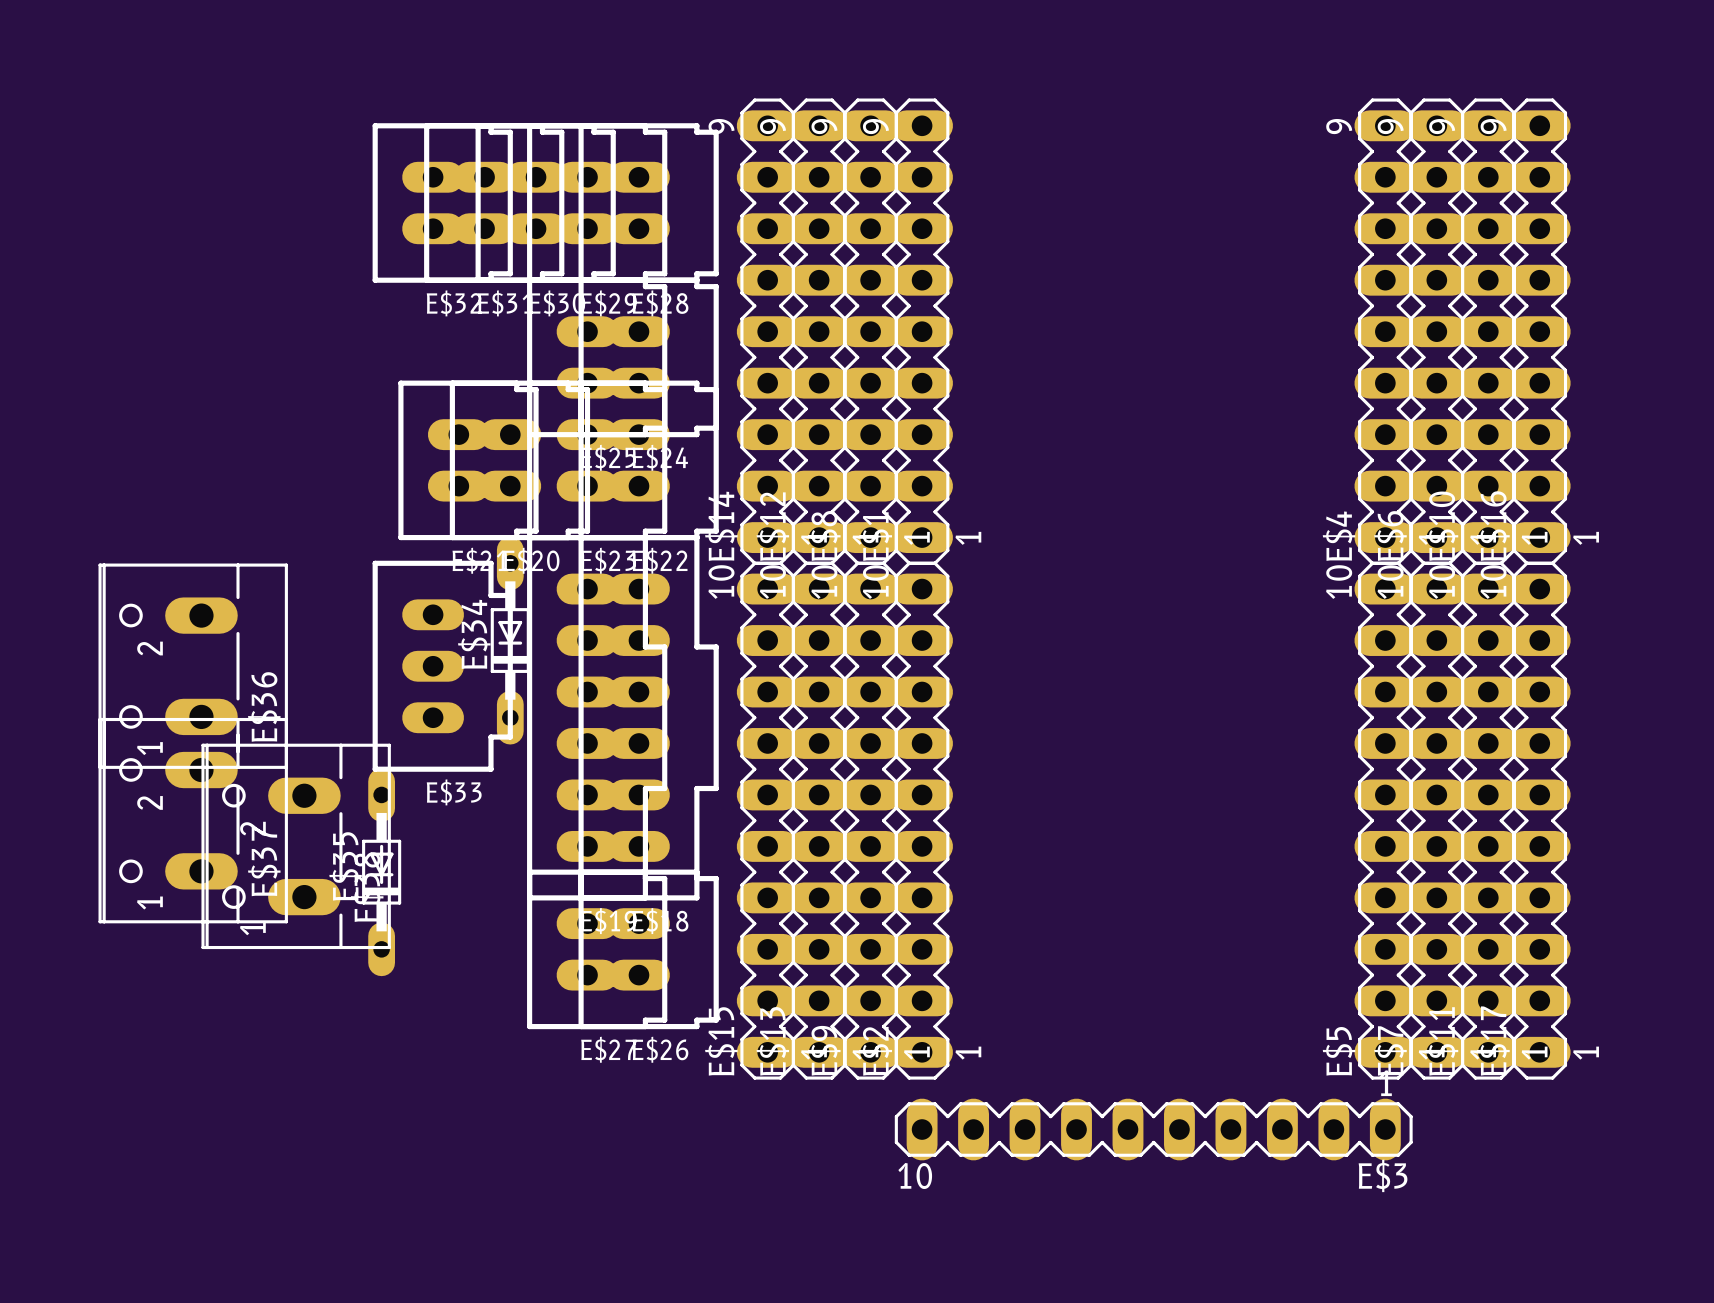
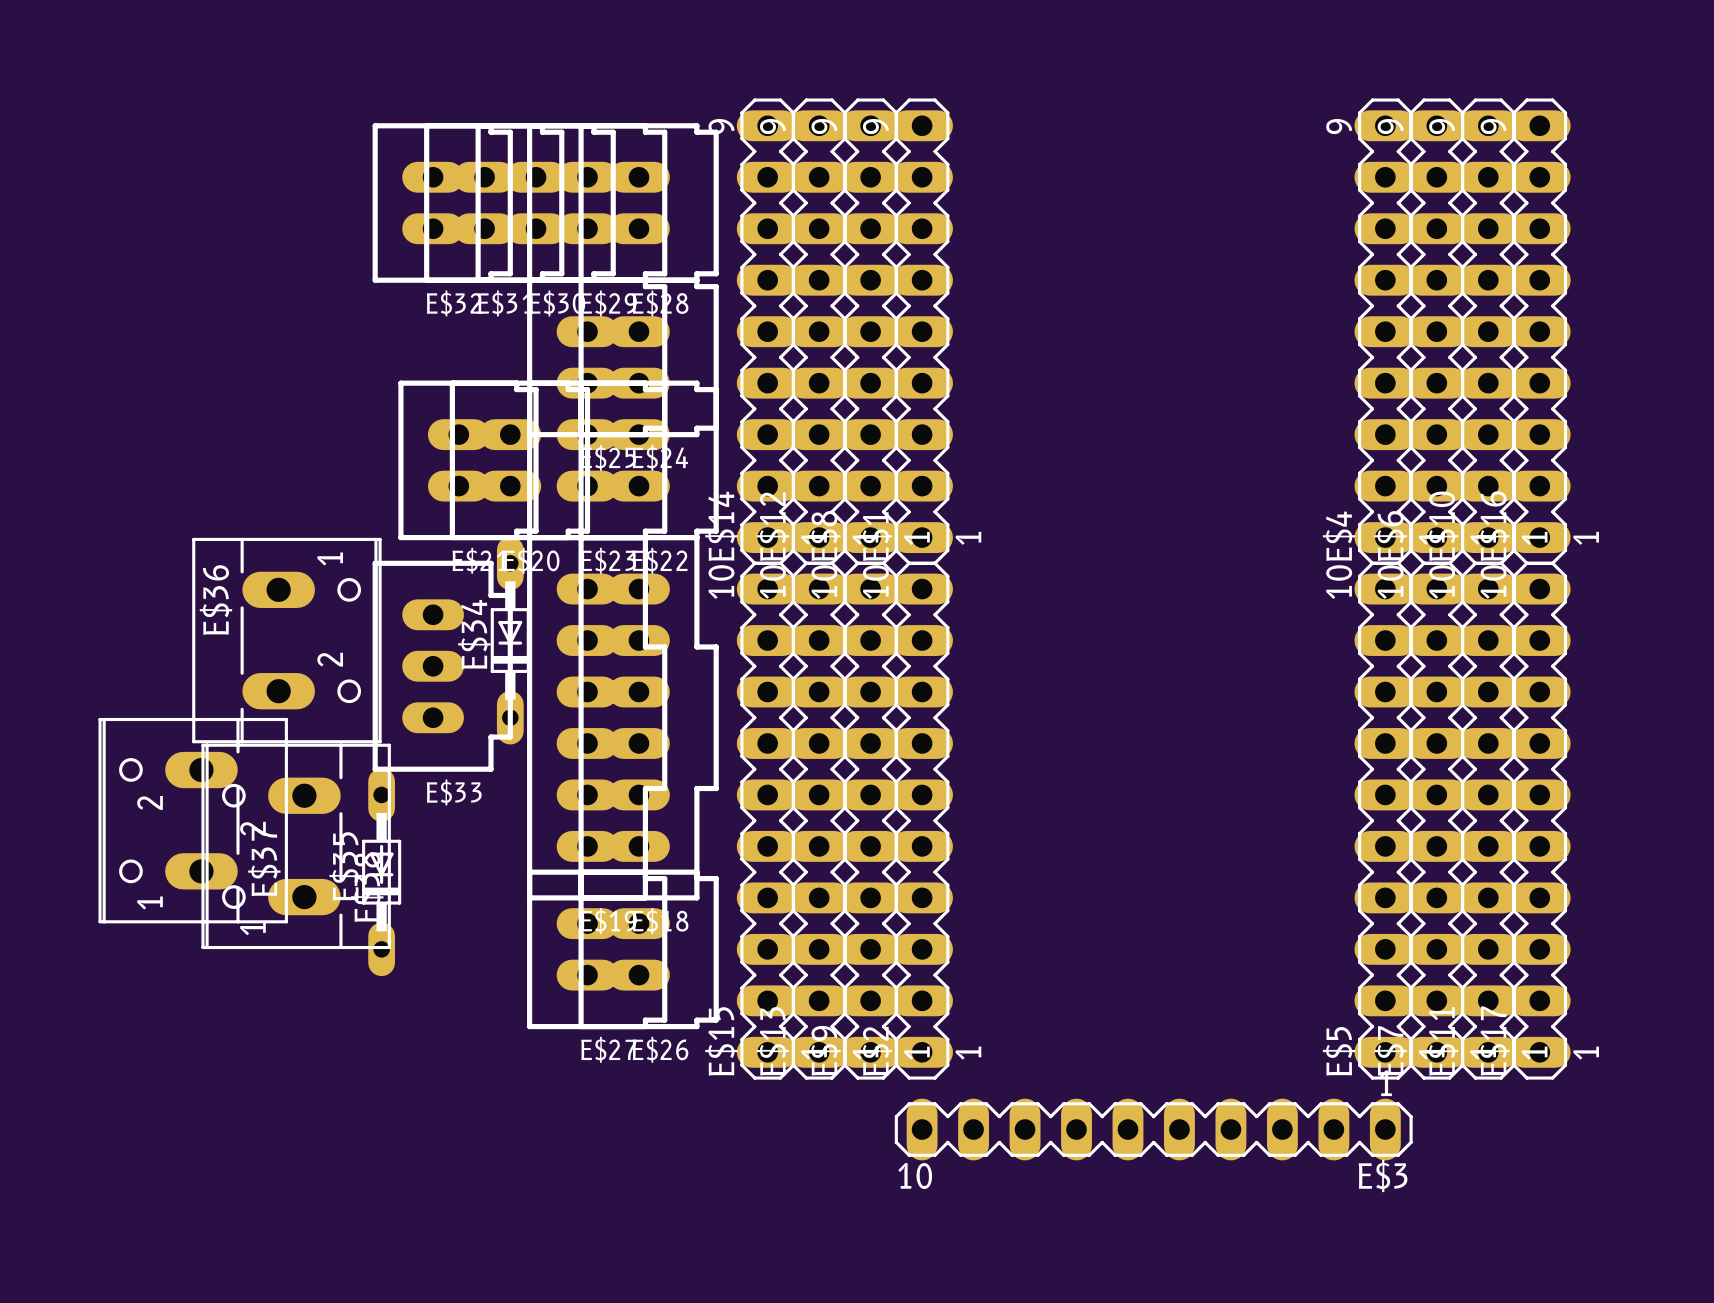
E$36 footprint: [98, 563, 288, 769] -> [192, 537, 382, 744]
E$36 name position: E$36 (264, 706) -> E$36 (215, 600)

